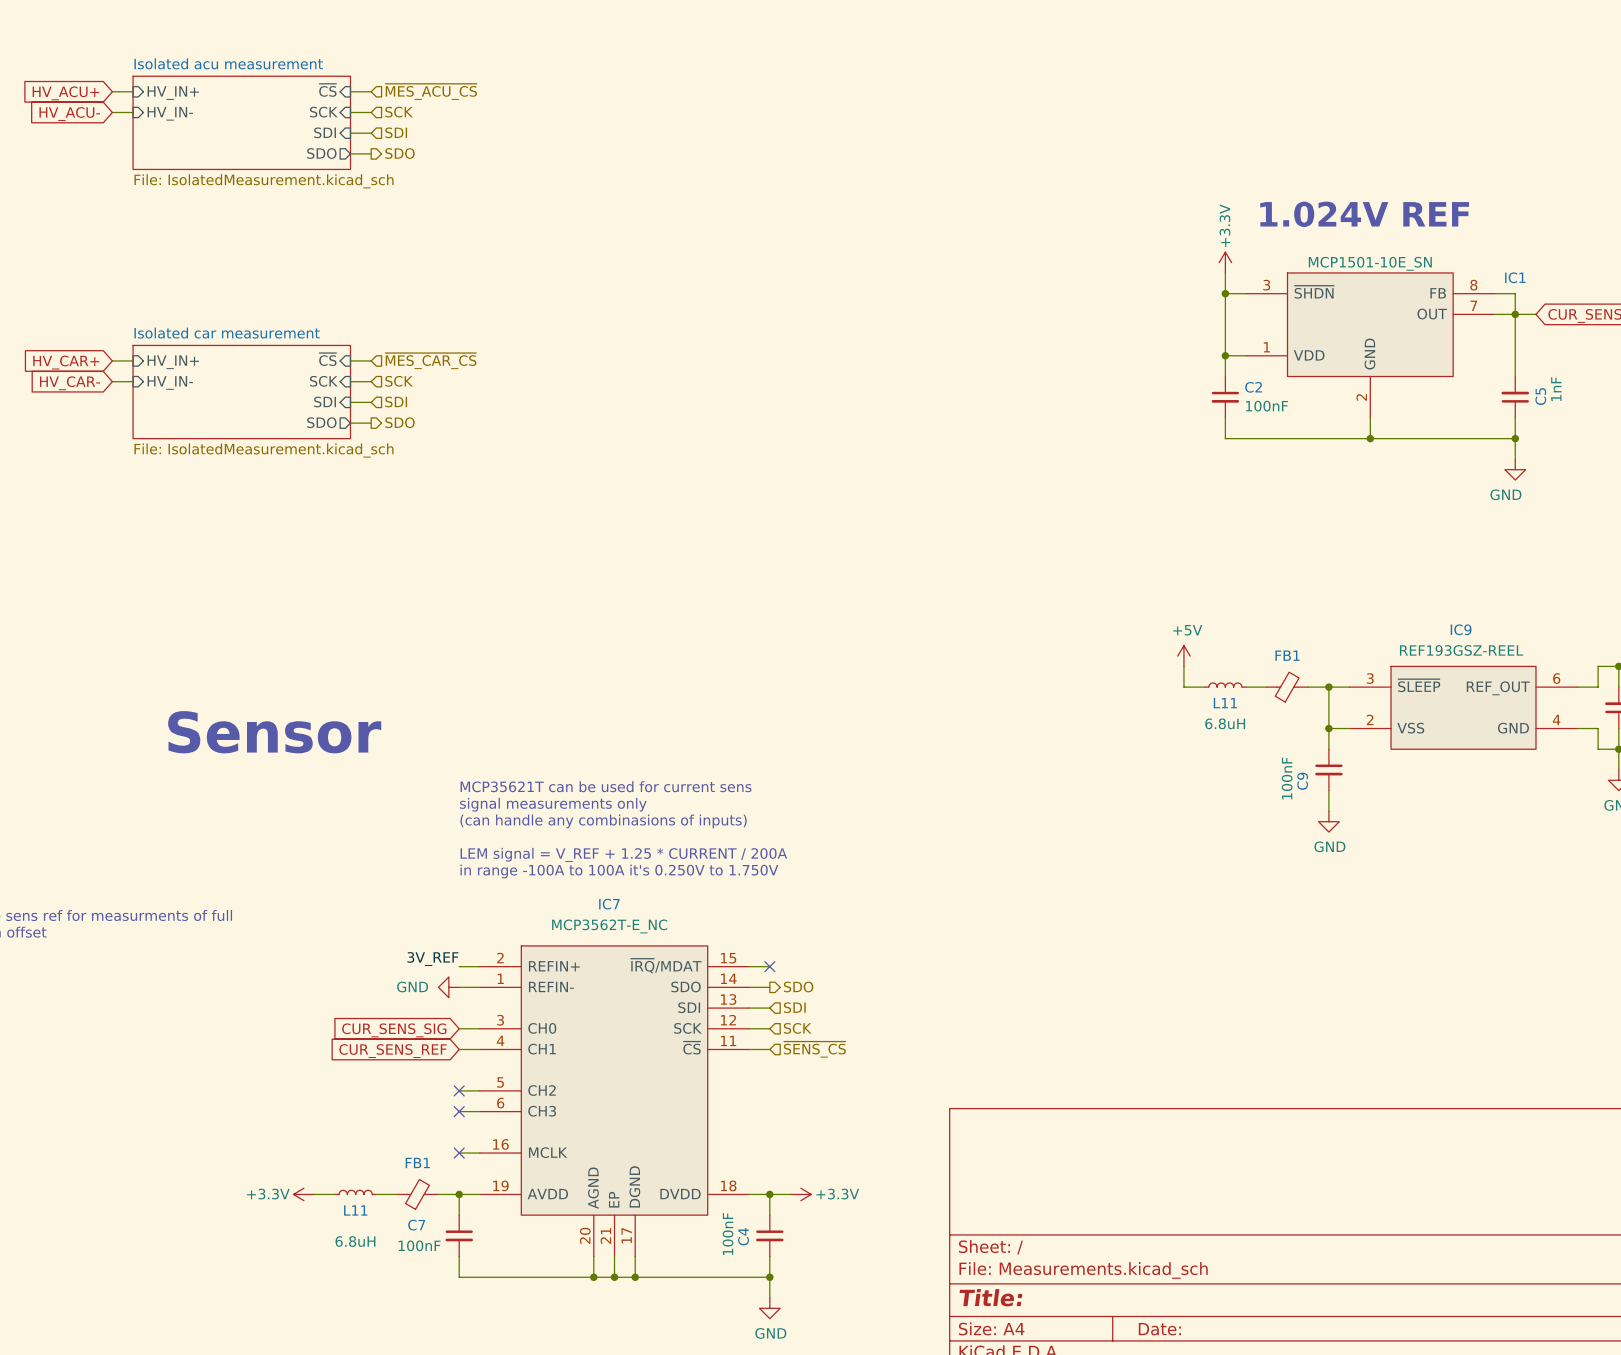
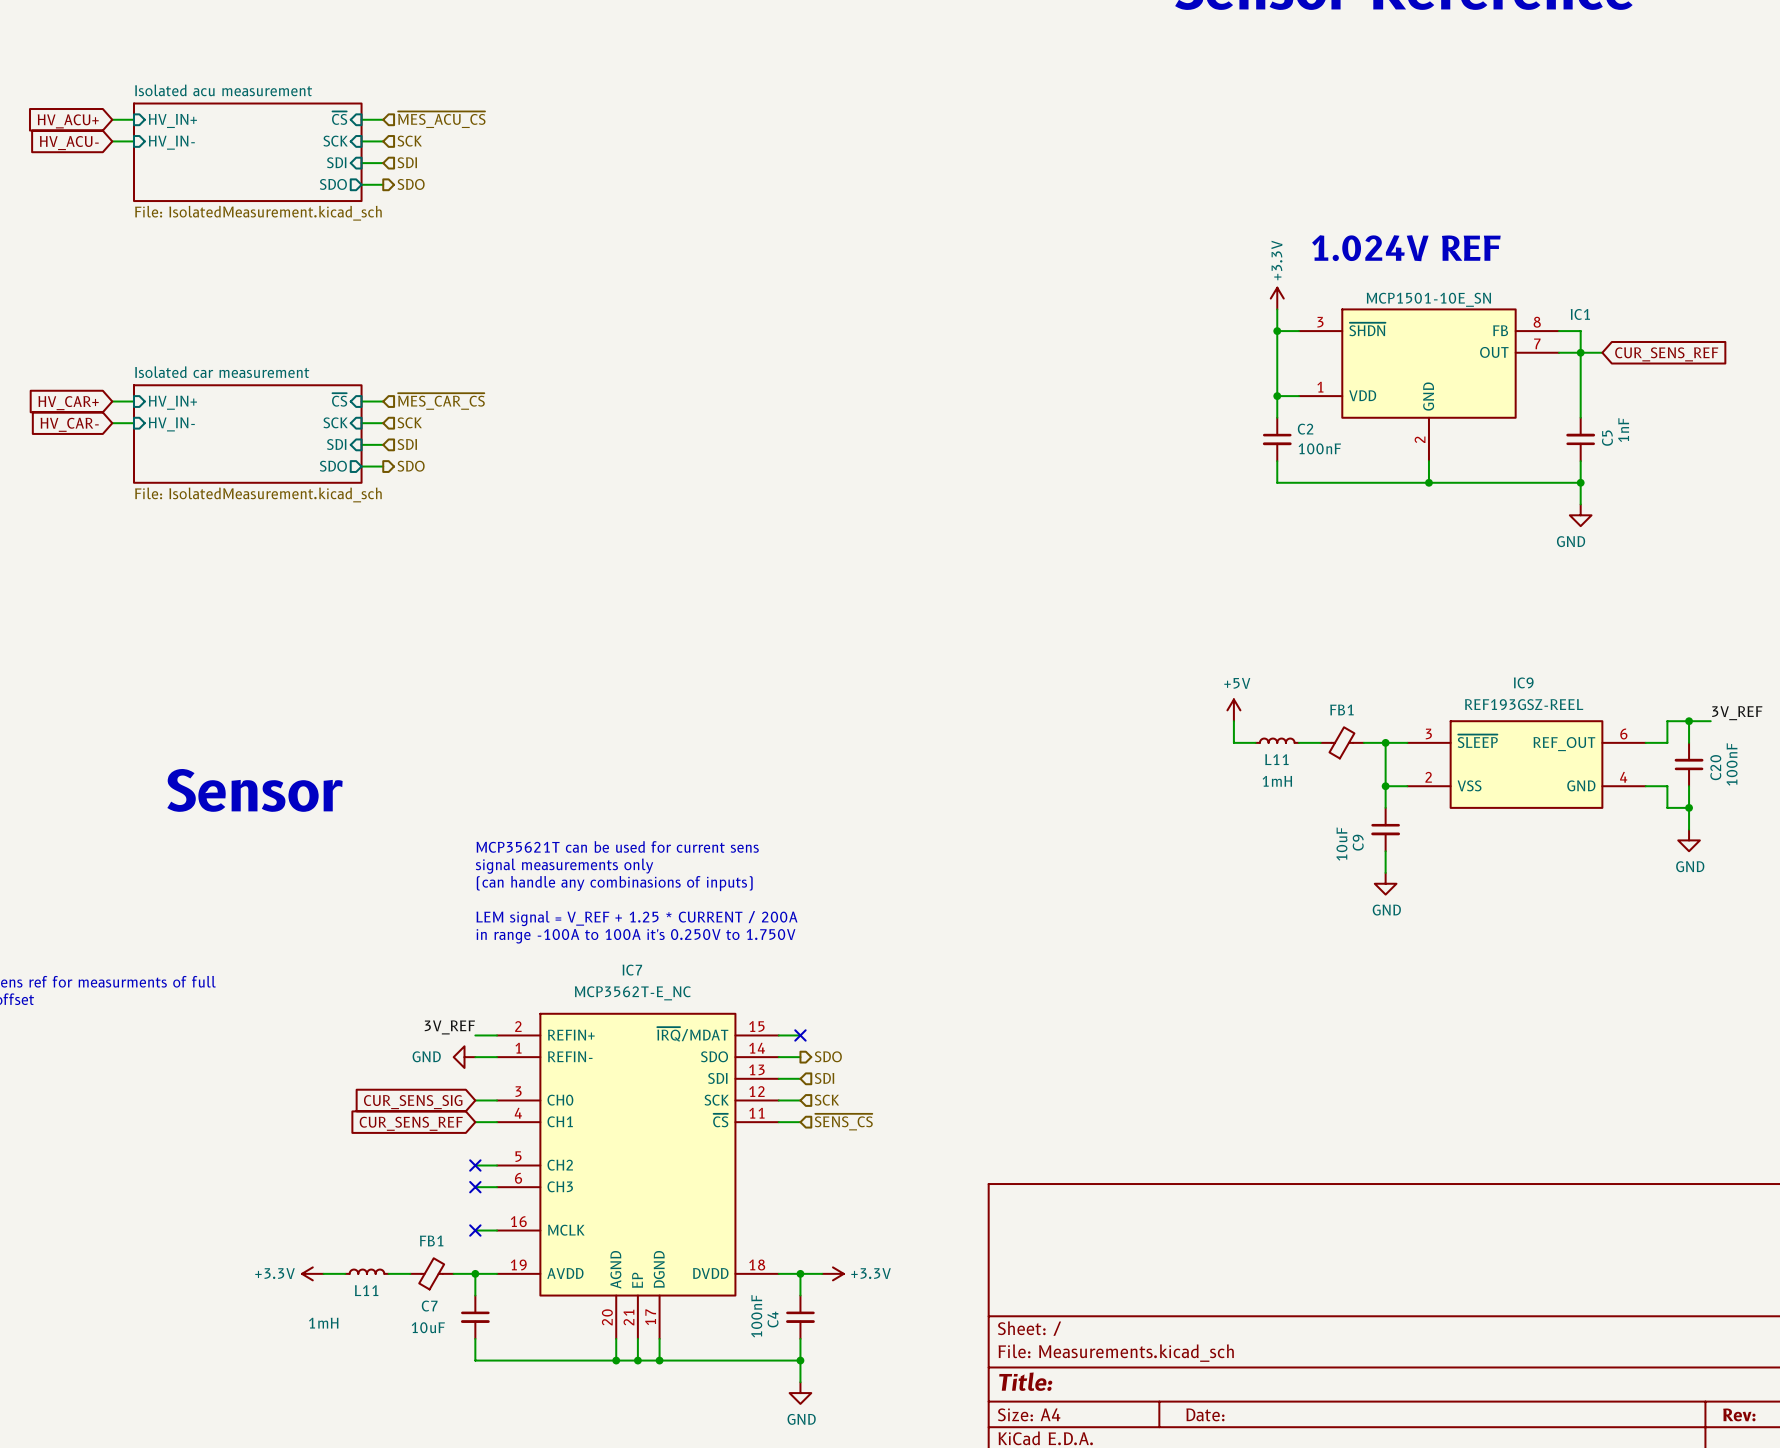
L11 value: 6.8uH (1225, 723) -> 1mH (1277, 781)
C9 value: 100nF (1287, 778) -> 10uF (1341, 844)
L11 value: 6.8uH (355, 1241) -> 1mH (323, 1323)
C7 value: 100nF (419, 1245) -> 10uF (428, 1327)

